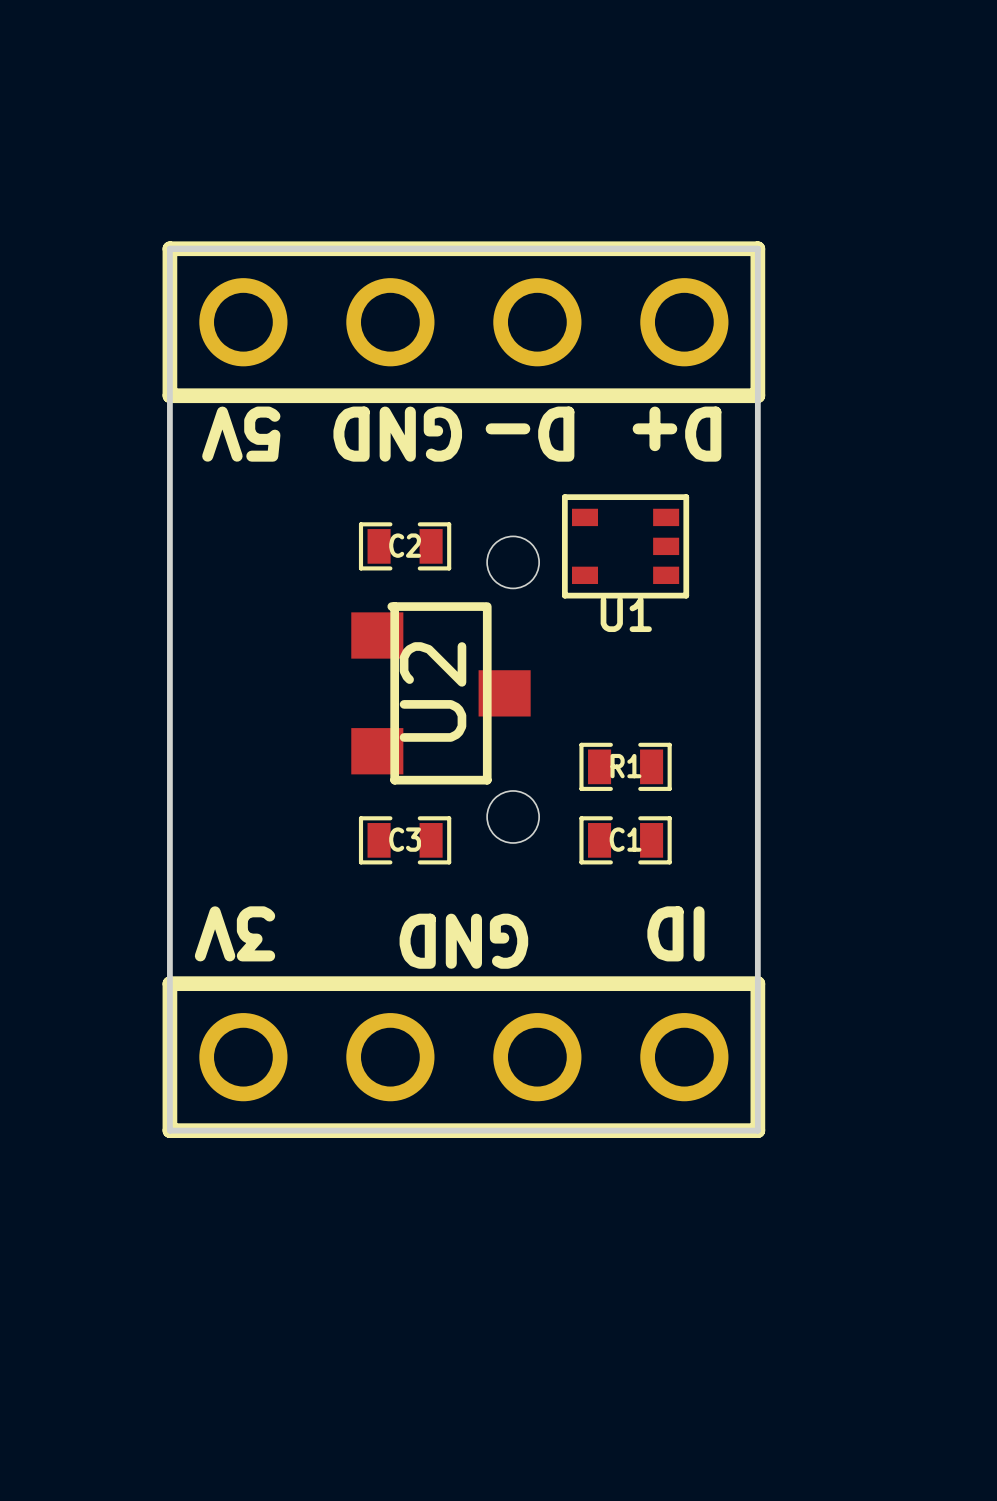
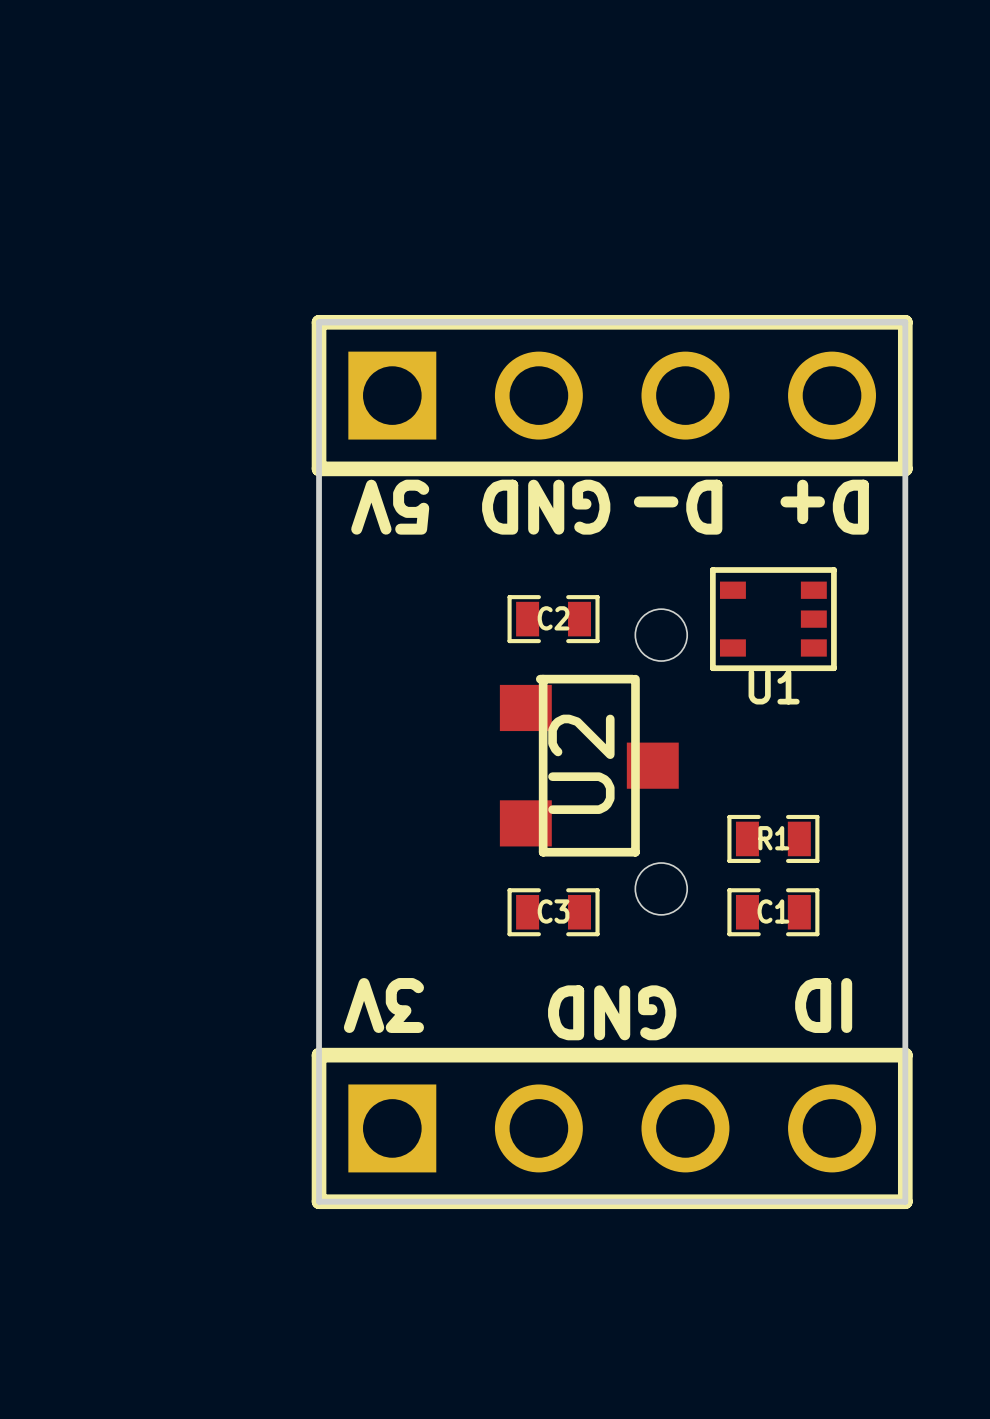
part footprint: [162, 241, 766, 404] -> [311, 314, 913, 477]
part footprint: [162, 976, 766, 1138] -> [311, 1047, 913, 1210]

